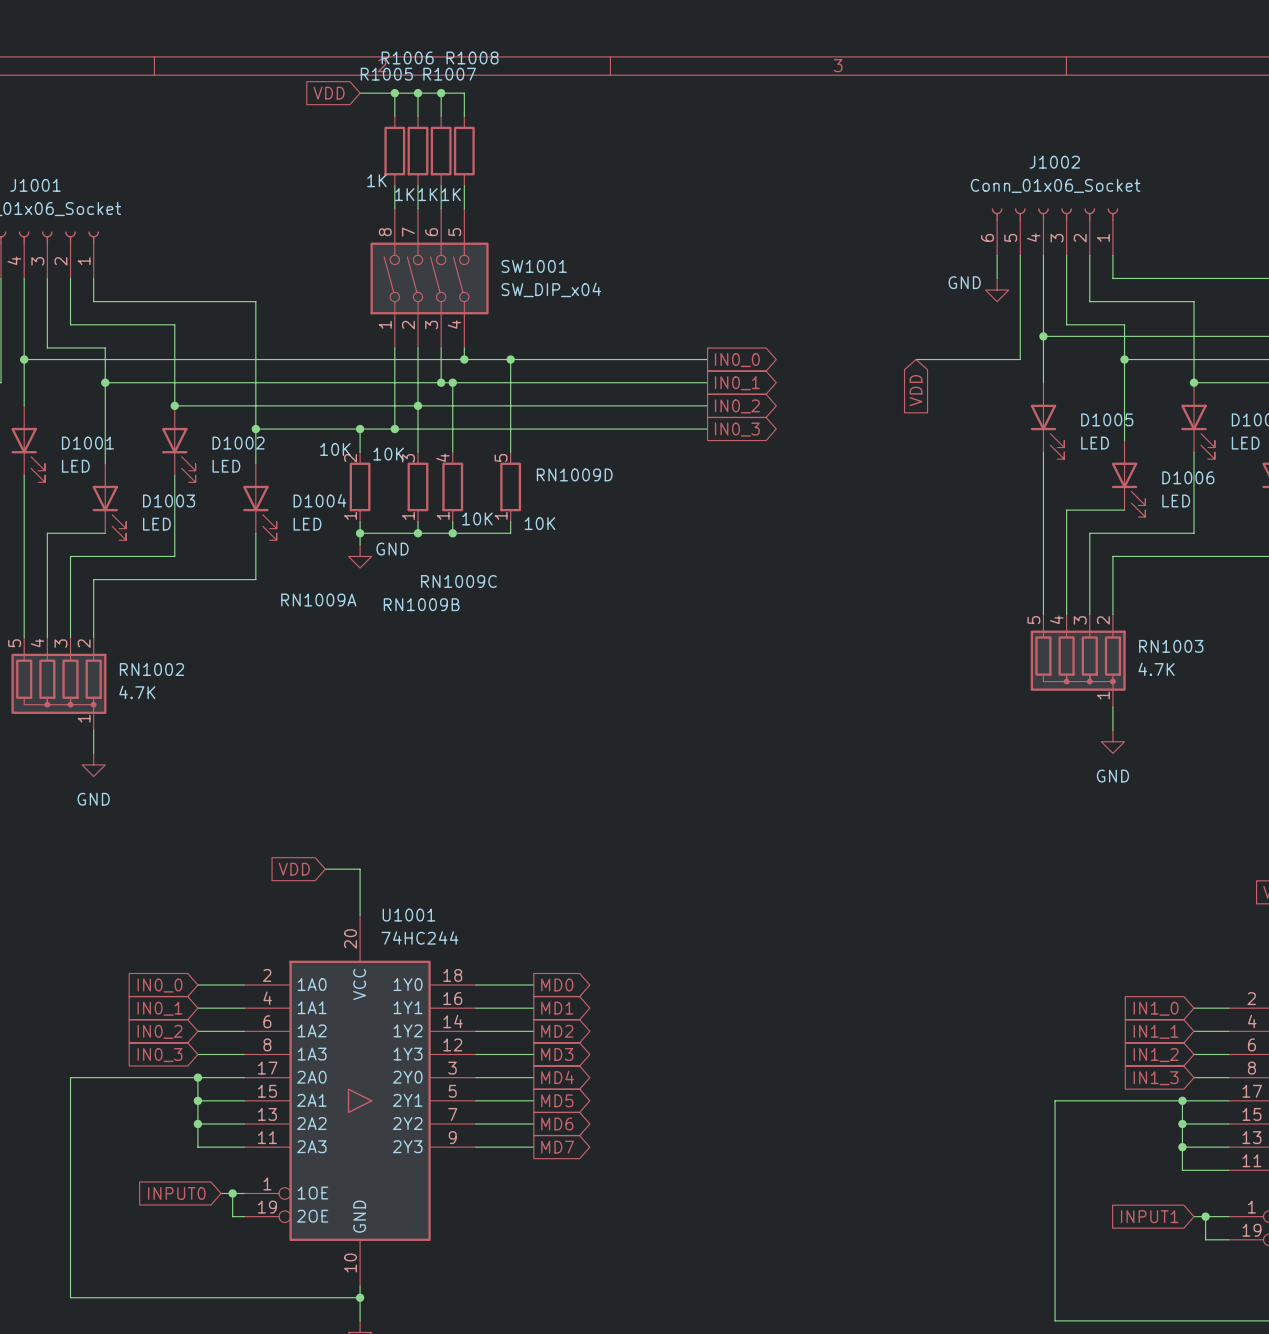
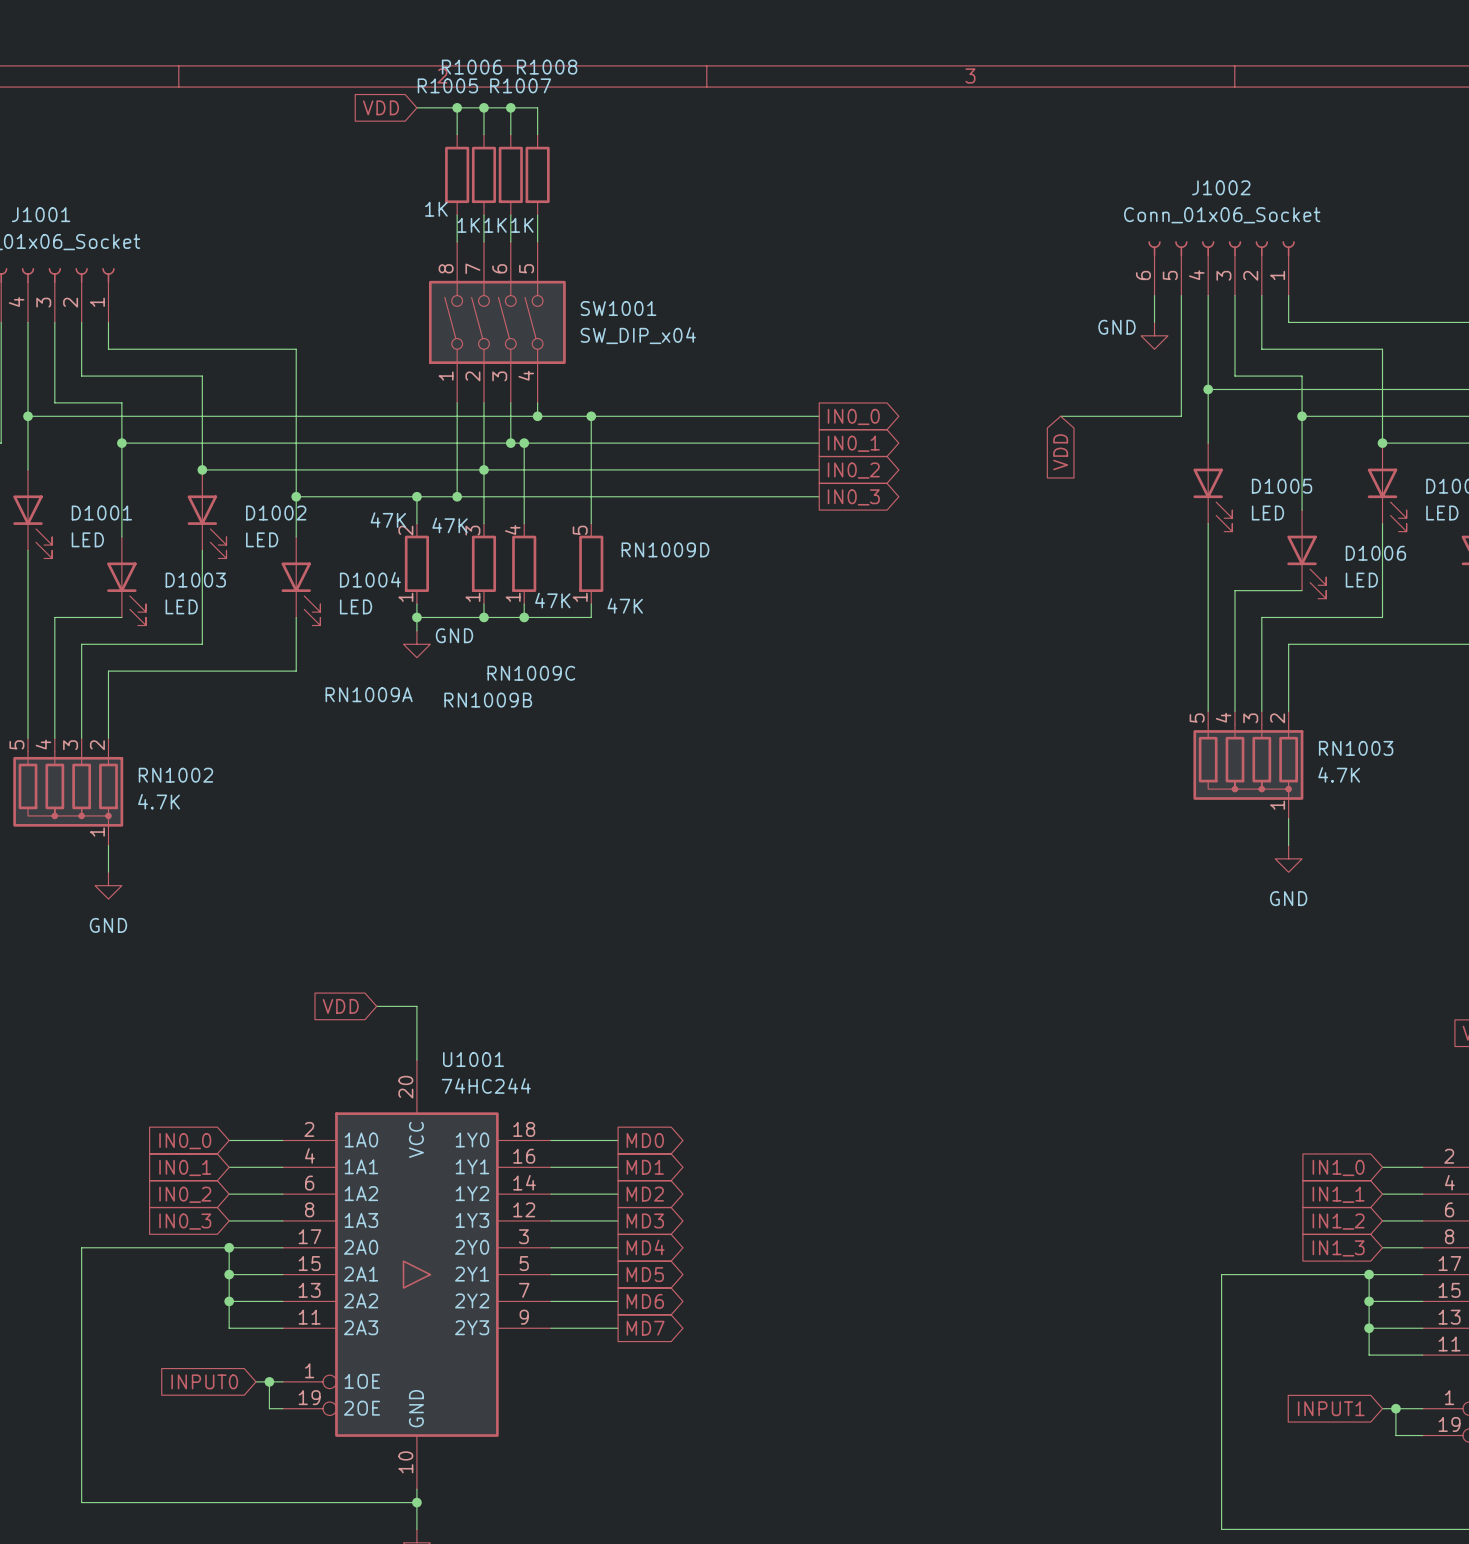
RN1009A value: 10K (335, 449) -> 47K (388, 520)
RN1009B value: 10K (388, 454) -> 47K (450, 525)
RN1009C value: 10K (477, 518) -> 47K (552, 600)
RN1009D value: 10K (539, 523) -> 47K (625, 605)

